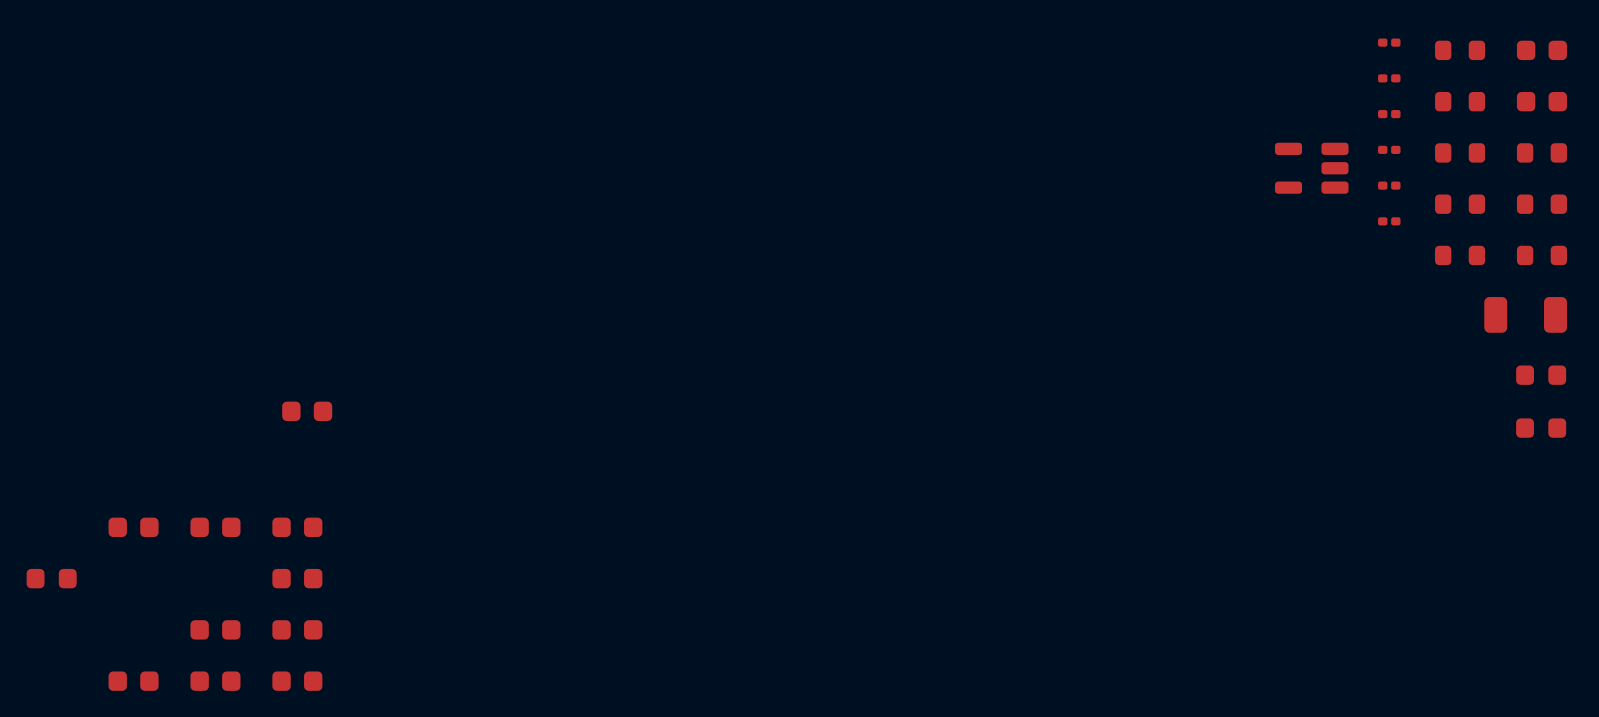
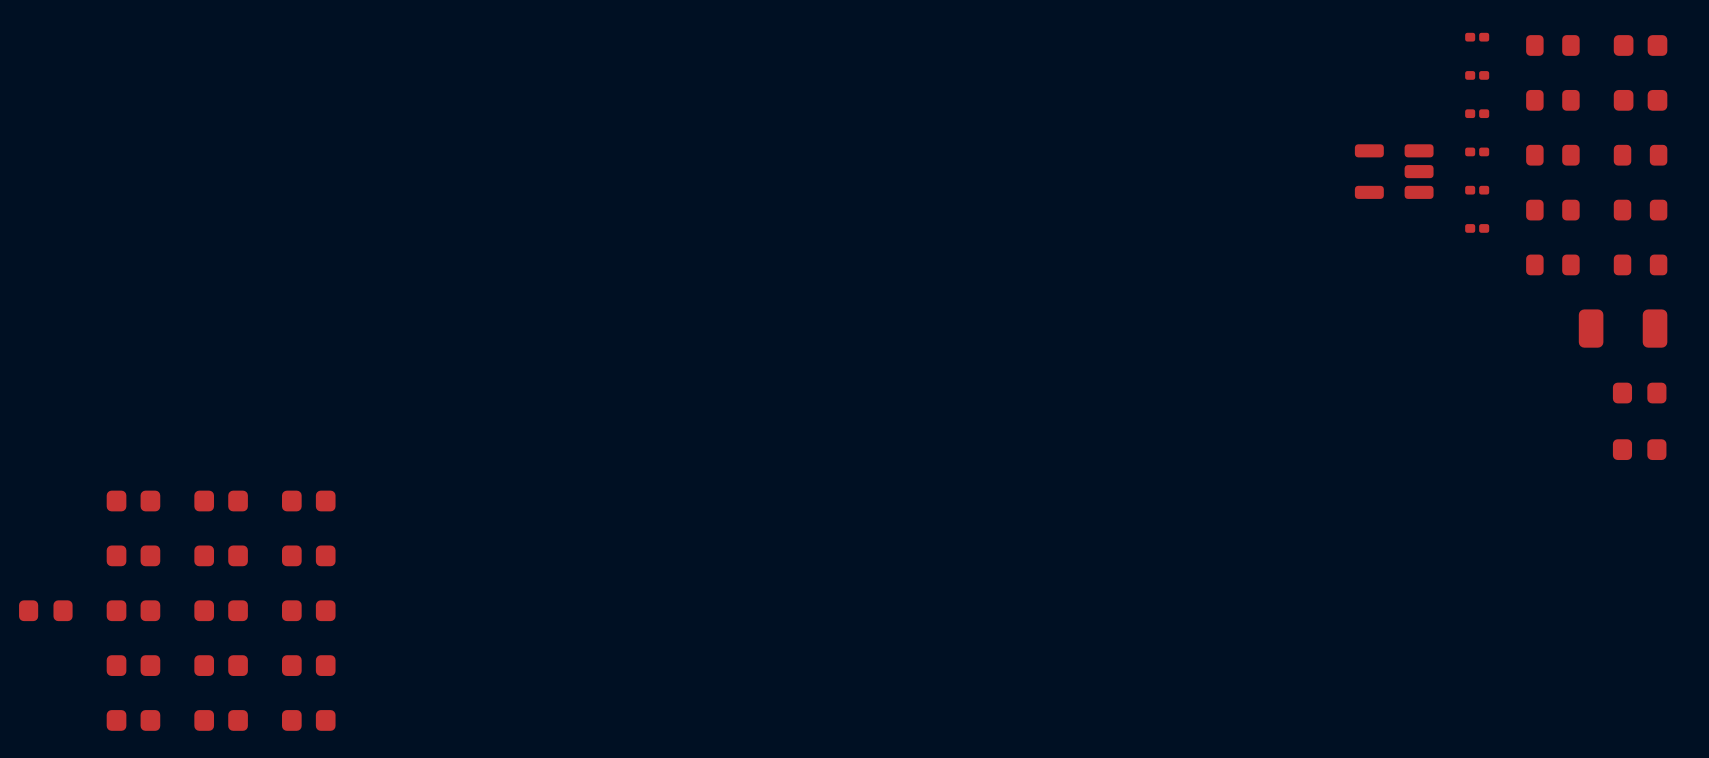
part: (307, 411) -> none
part: none -> (133, 501)
part: none -> (221, 501)
part: none -> (308, 501)
part: none -> (133, 610)
part: none -> (221, 610)
part: none -> (133, 665)

